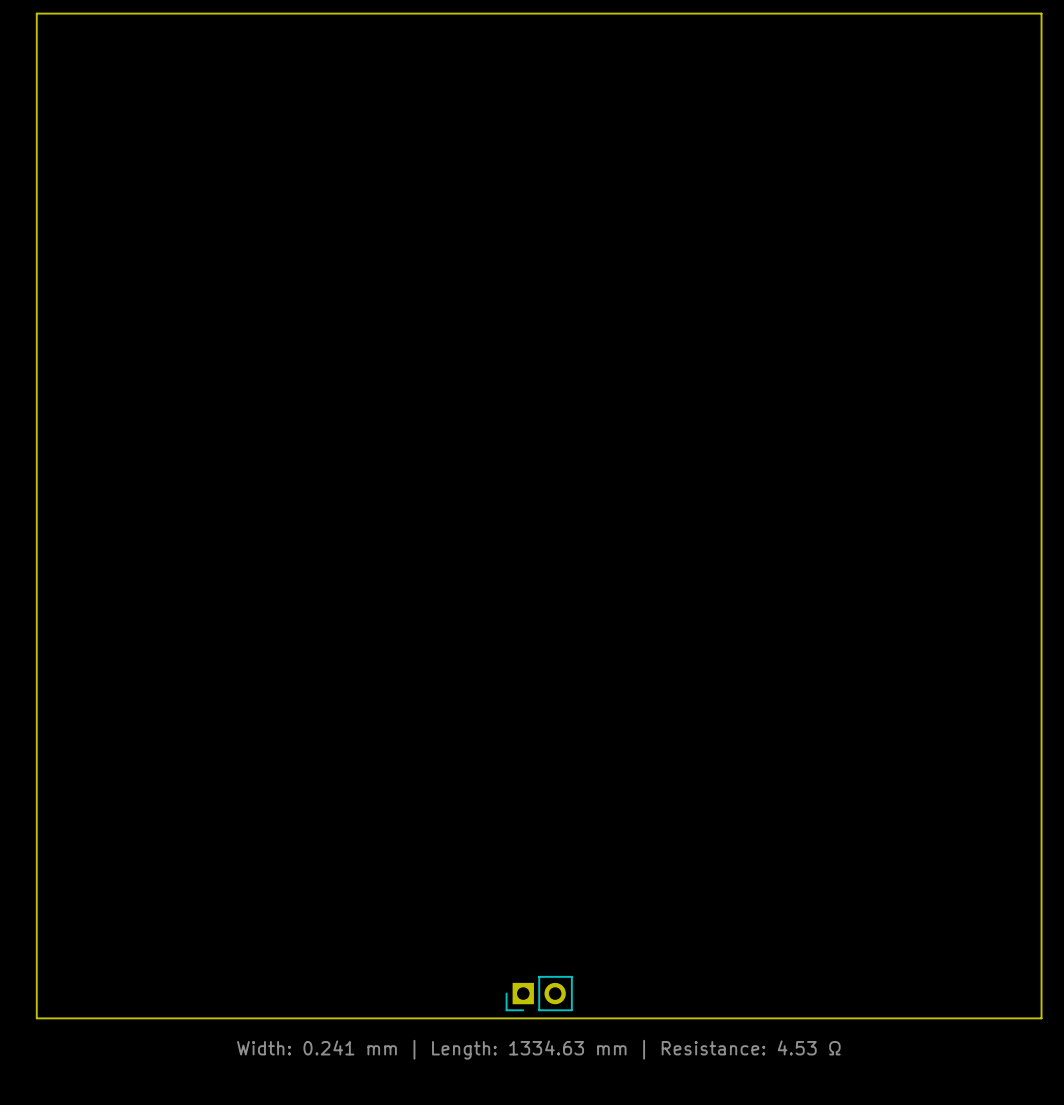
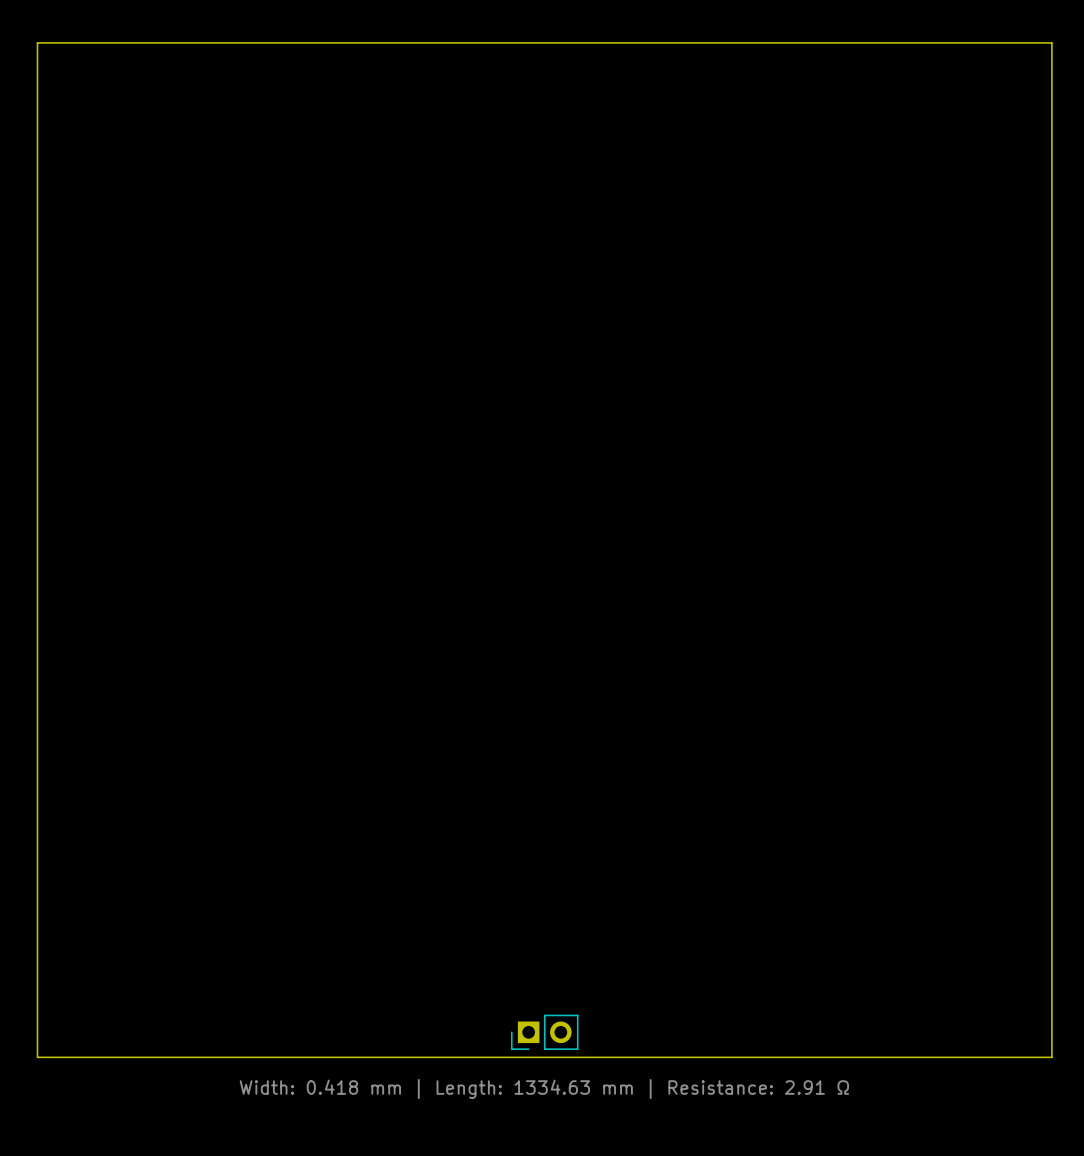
text: Width: 0.241 mm | Length: 1334.63 mm | Resistance: 4.53 Ω (538, 1049) -> Width: 0.418 mm | Length: 1334.63 mm | Resistance: 2.91 Ω (544, 1089)

